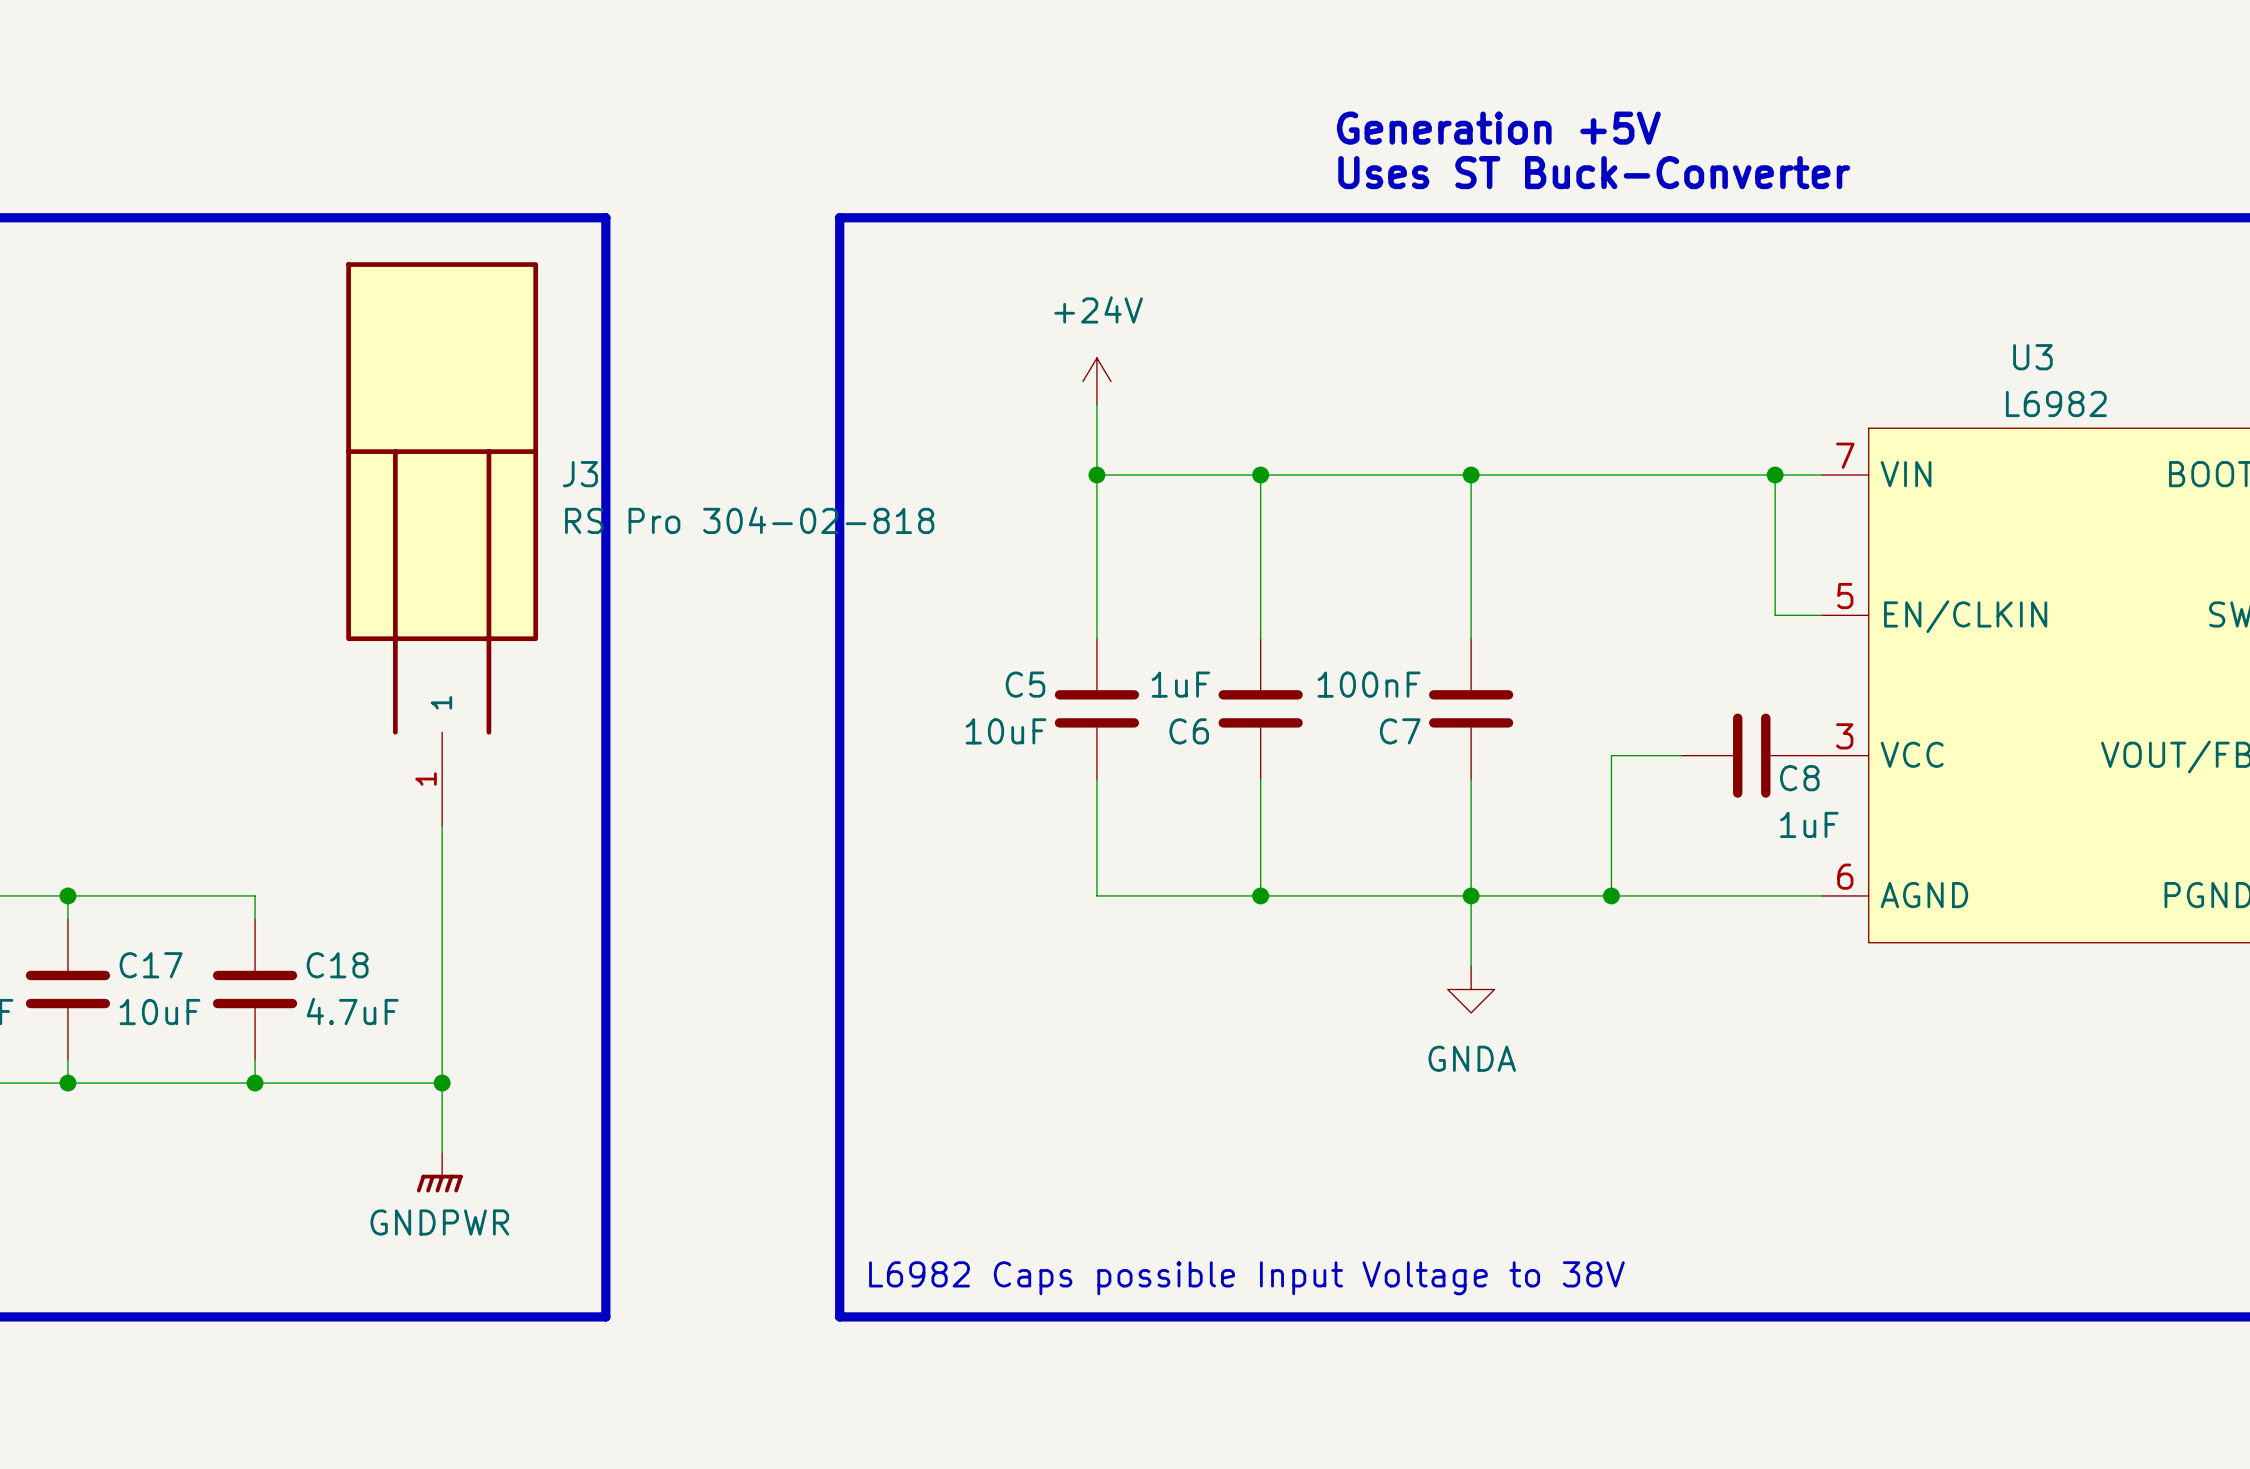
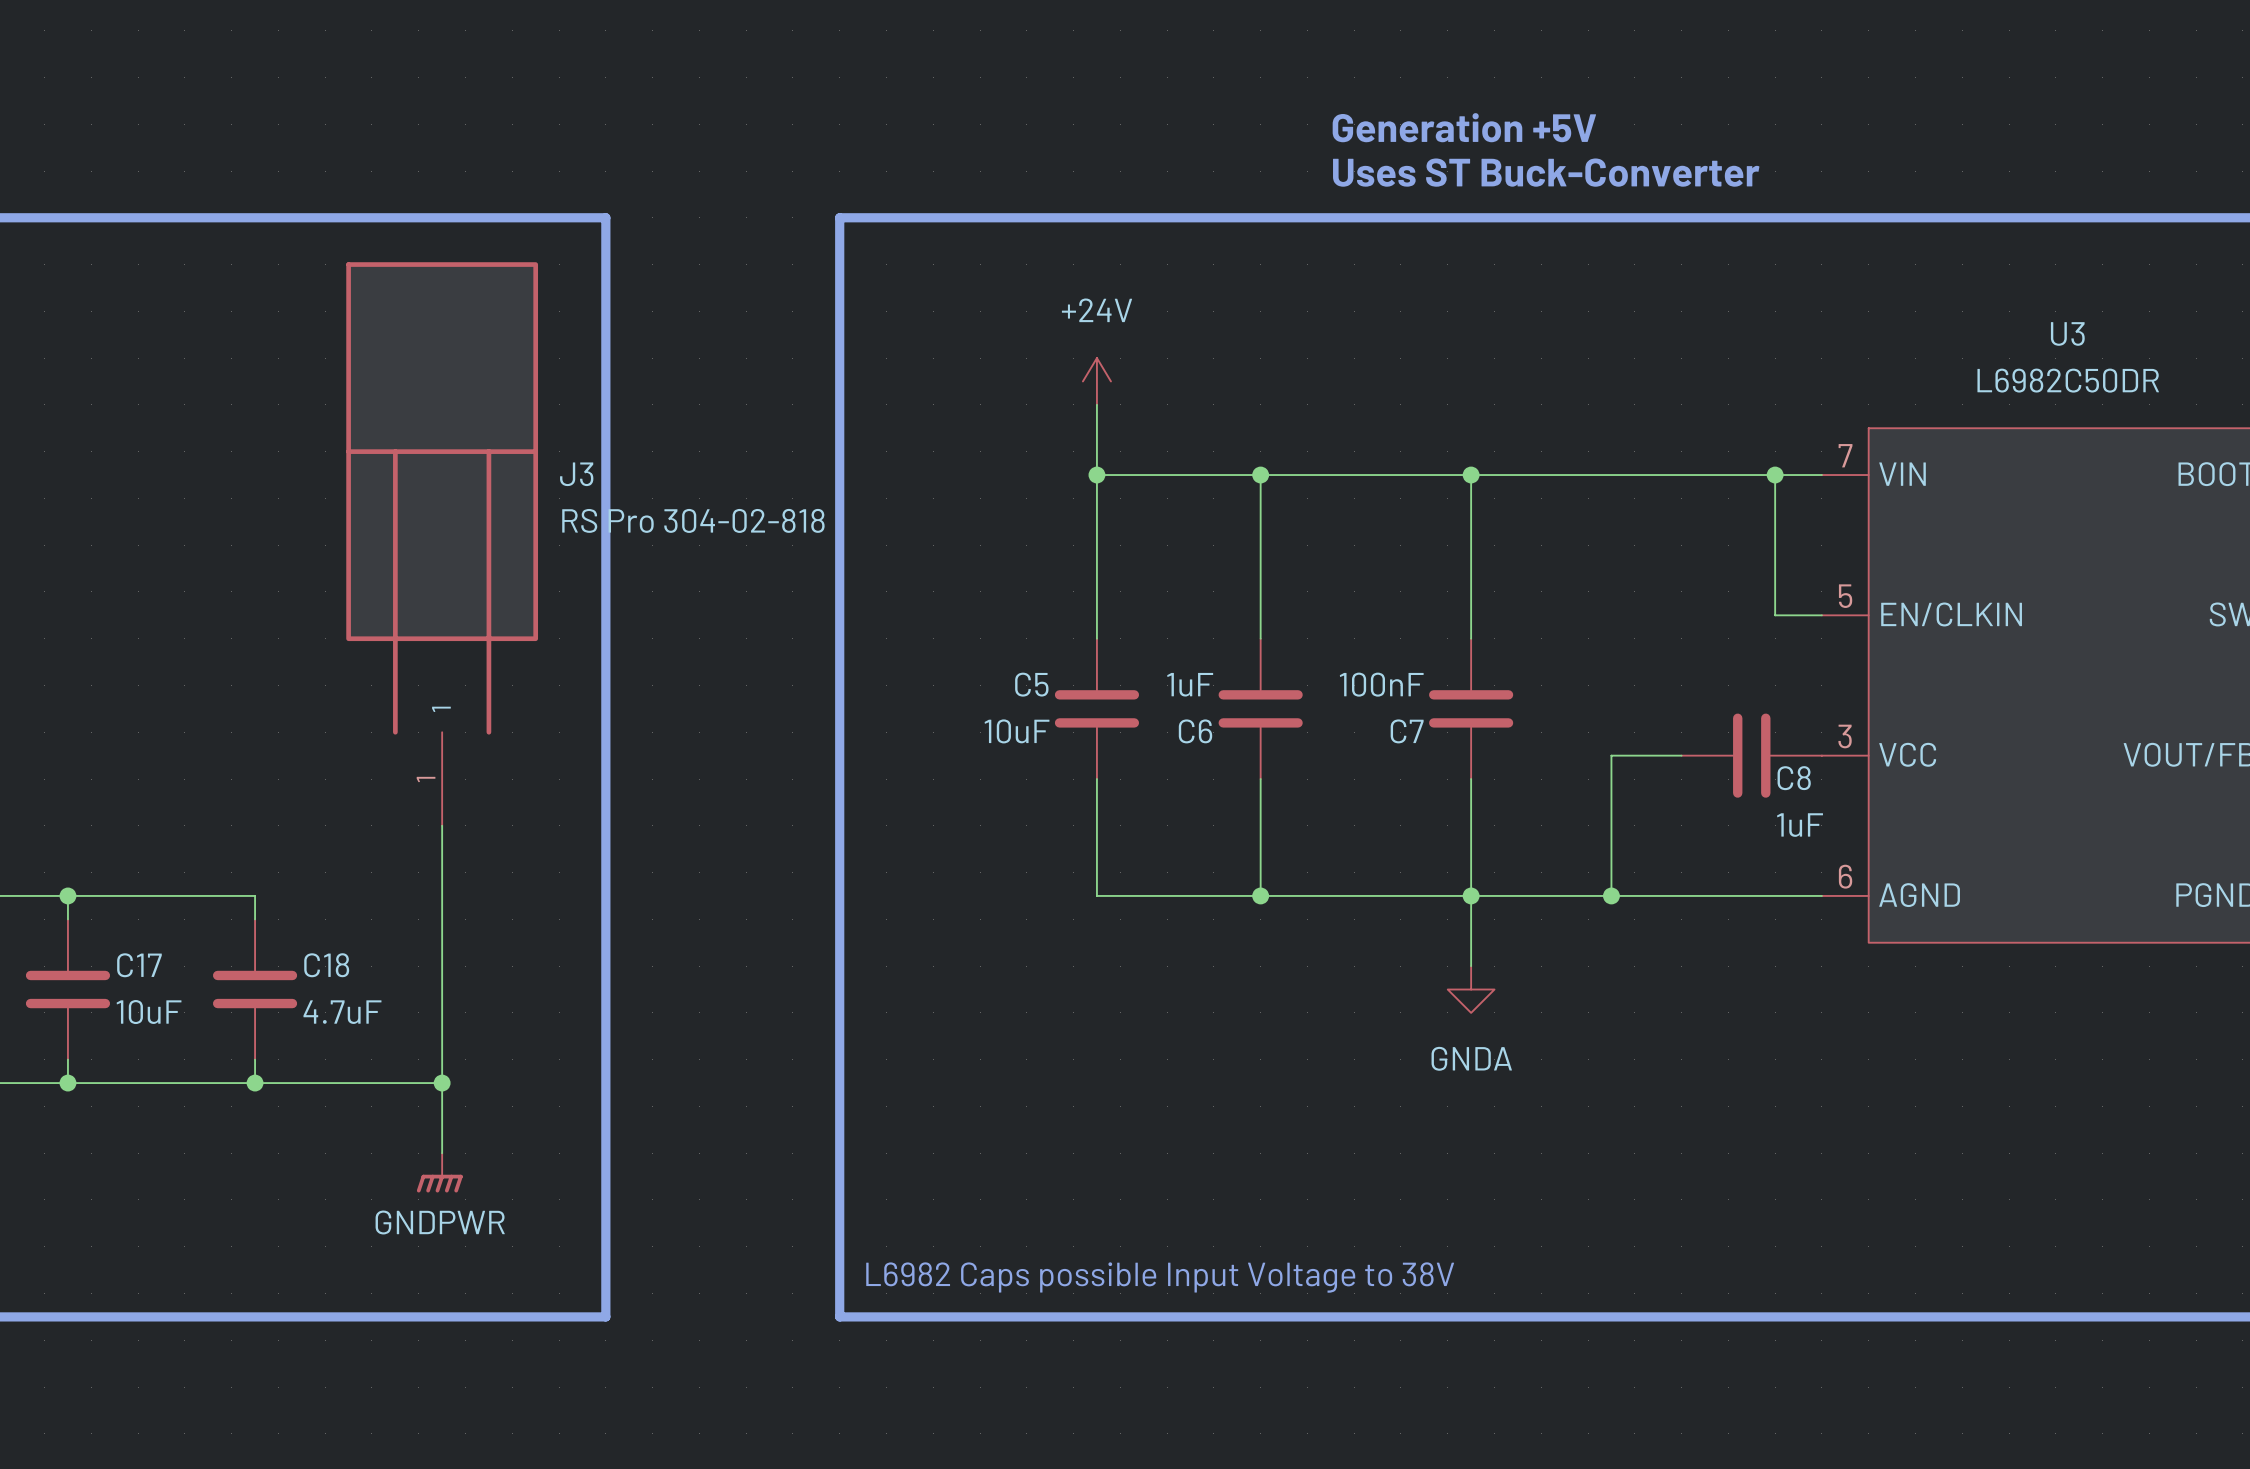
U3 name position: U3 (2032, 357) -> U3 (2067, 333)
U3 value: L6982 (2056, 403) -> L6982C50DR (2068, 380)

